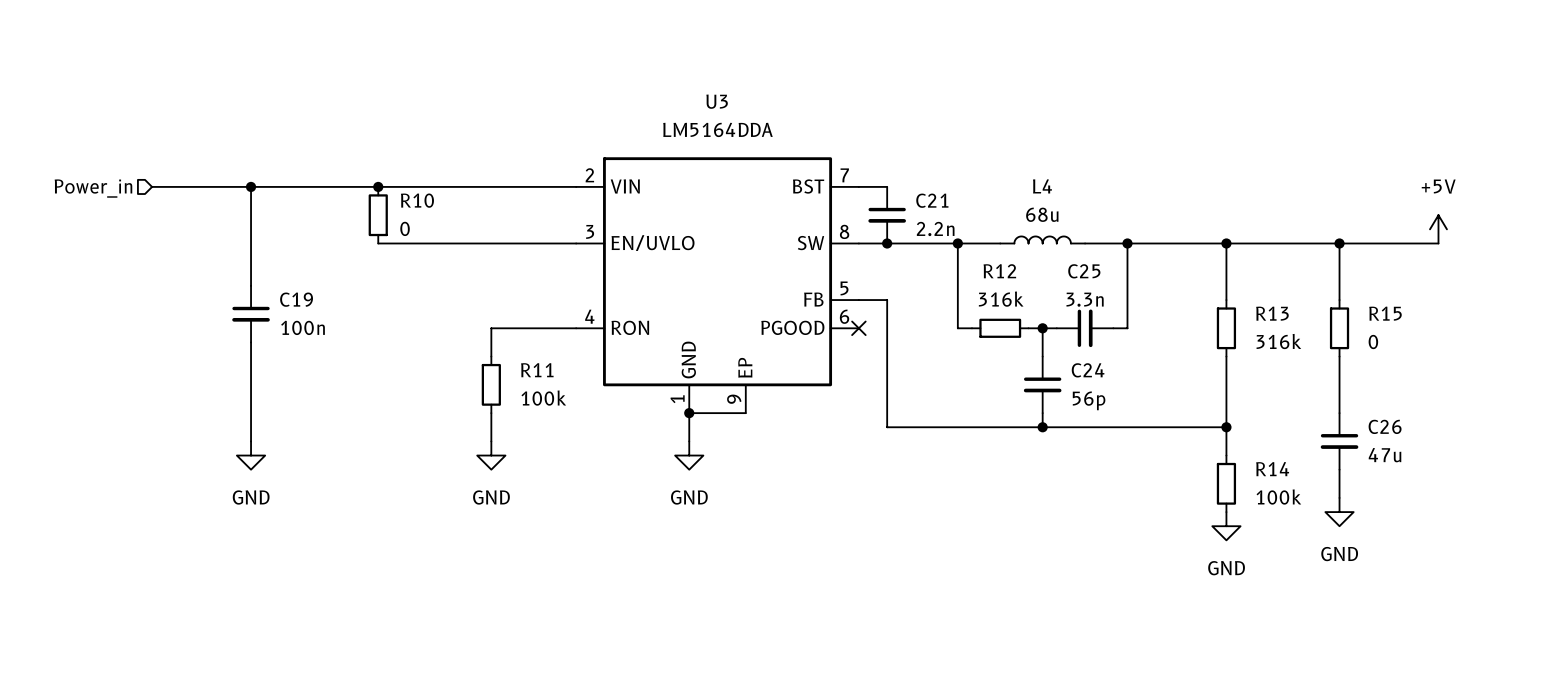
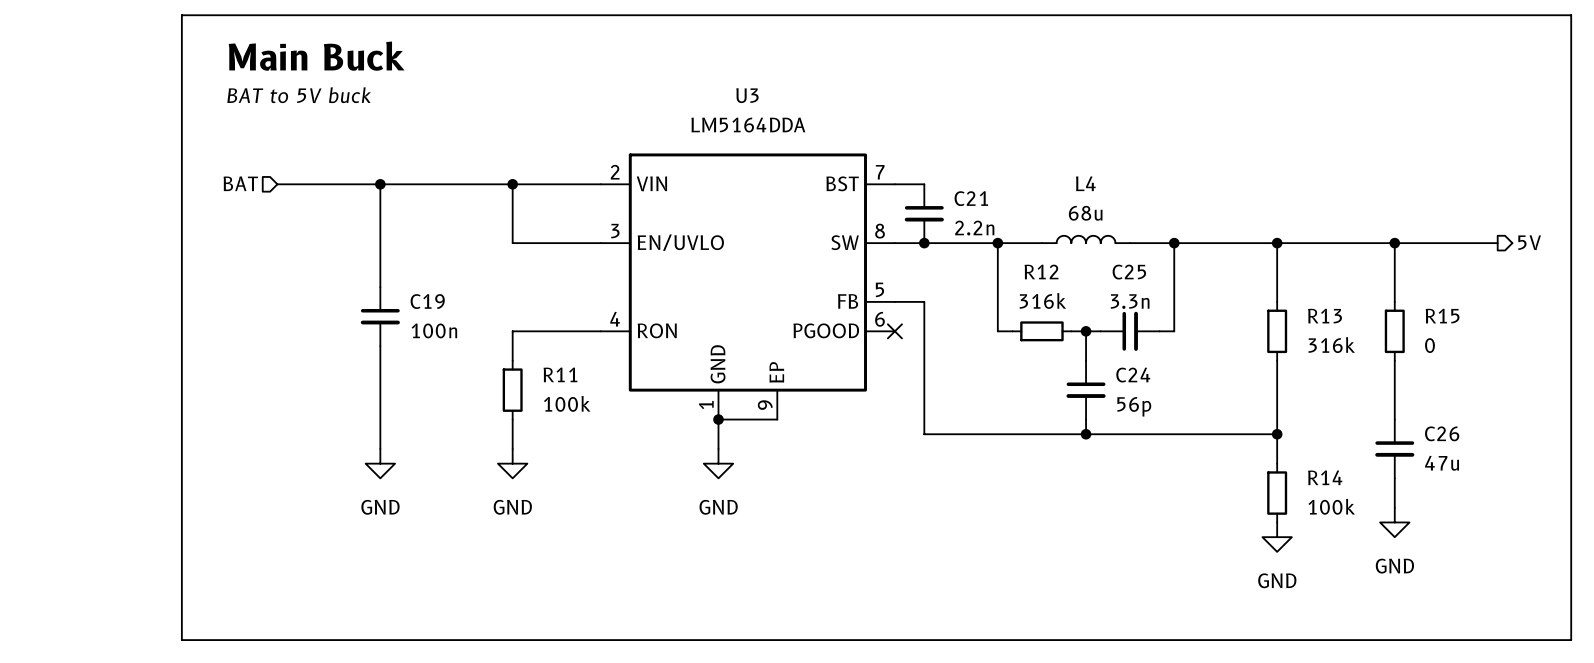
line: none -> (181, 15) (1571, 15) (1571, 640) (181, 640) (181, 15)
text: none -> Main Buck (316, 56)
text: none -> BAT to 5V buck (299, 95)
wire: (152, 186) (265, 186) -> none
hierarchical label: none -> BAT (240, 183)
wire: (251, 186) (251, 285) -> (380, 184) (380, 287)
junction: (251, 186) -> none
junction position: (378, 186) -> (380, 184)
junction: none -> (512, 184)
hierarchical label: Power_in (93, 188) -> none
R10: 0 (378, 215) -> none
power symbol: +5V (1438, 229) -> none
wire: (378, 243) (491, 243) -> (512, 184) (512, 243)
hierarchical label: none -> 5V (1529, 242)
C19 position: (251, 314) -> (380, 316)
wire: (251, 342) (251, 441) -> (380, 346) (380, 448)
power symbol position: GND (251, 455) -> GND (380, 463)

